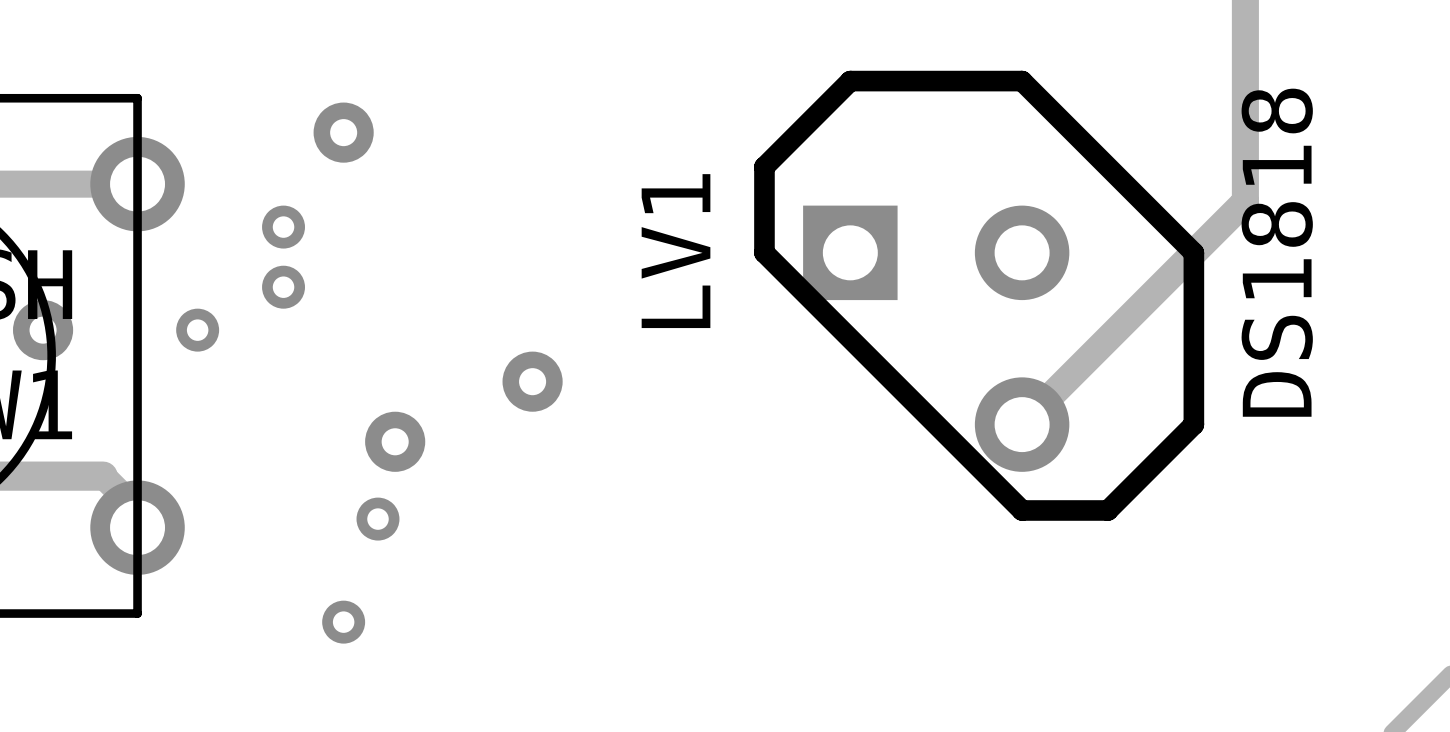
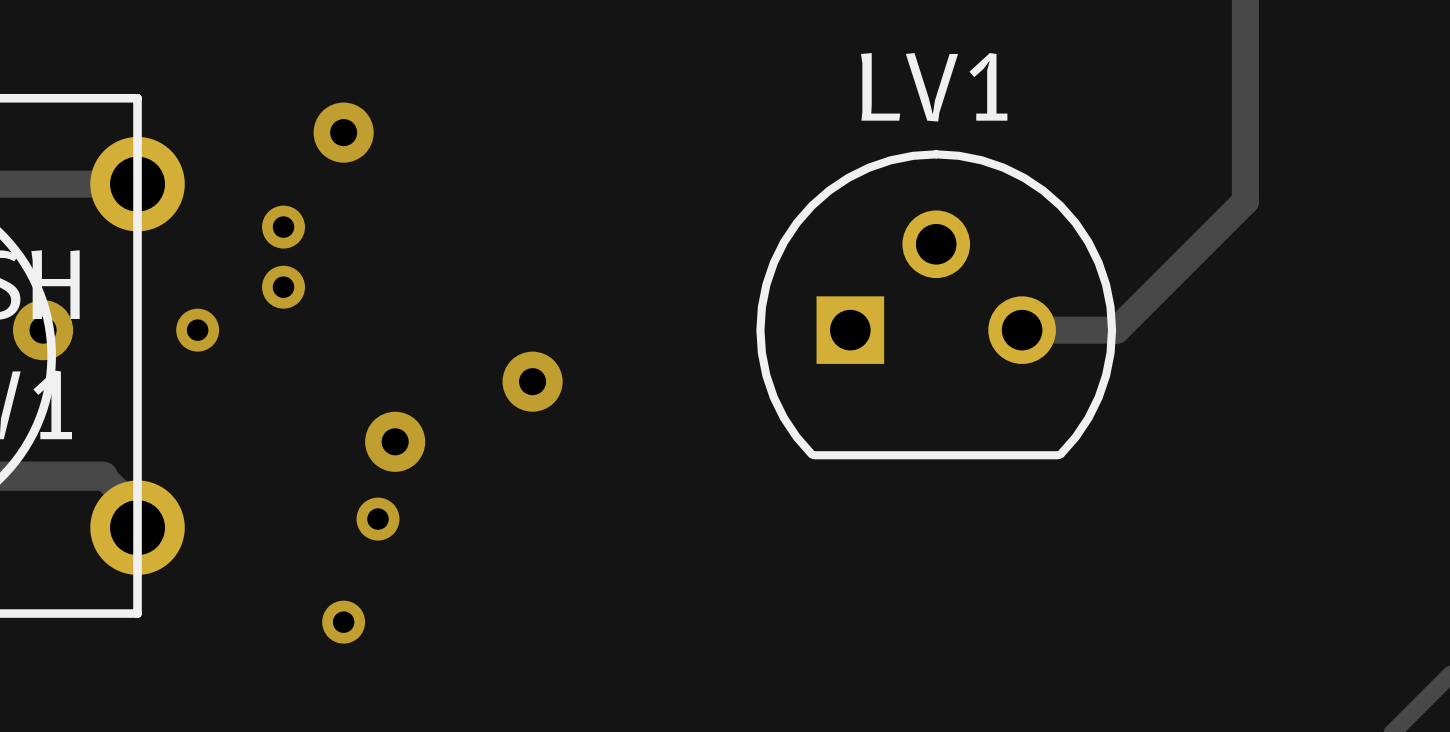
LV1 footprint: [754, 70, 1205, 521] -> [756, 150, 1117, 460]
LV1 name position: LV1 (676, 251) -> LV1 (934, 87)
LV1 value: DS1818 (1277, 252) -> none
track: (1116, 330) (1022, 424) -> (1116, 330) (1022, 330)

